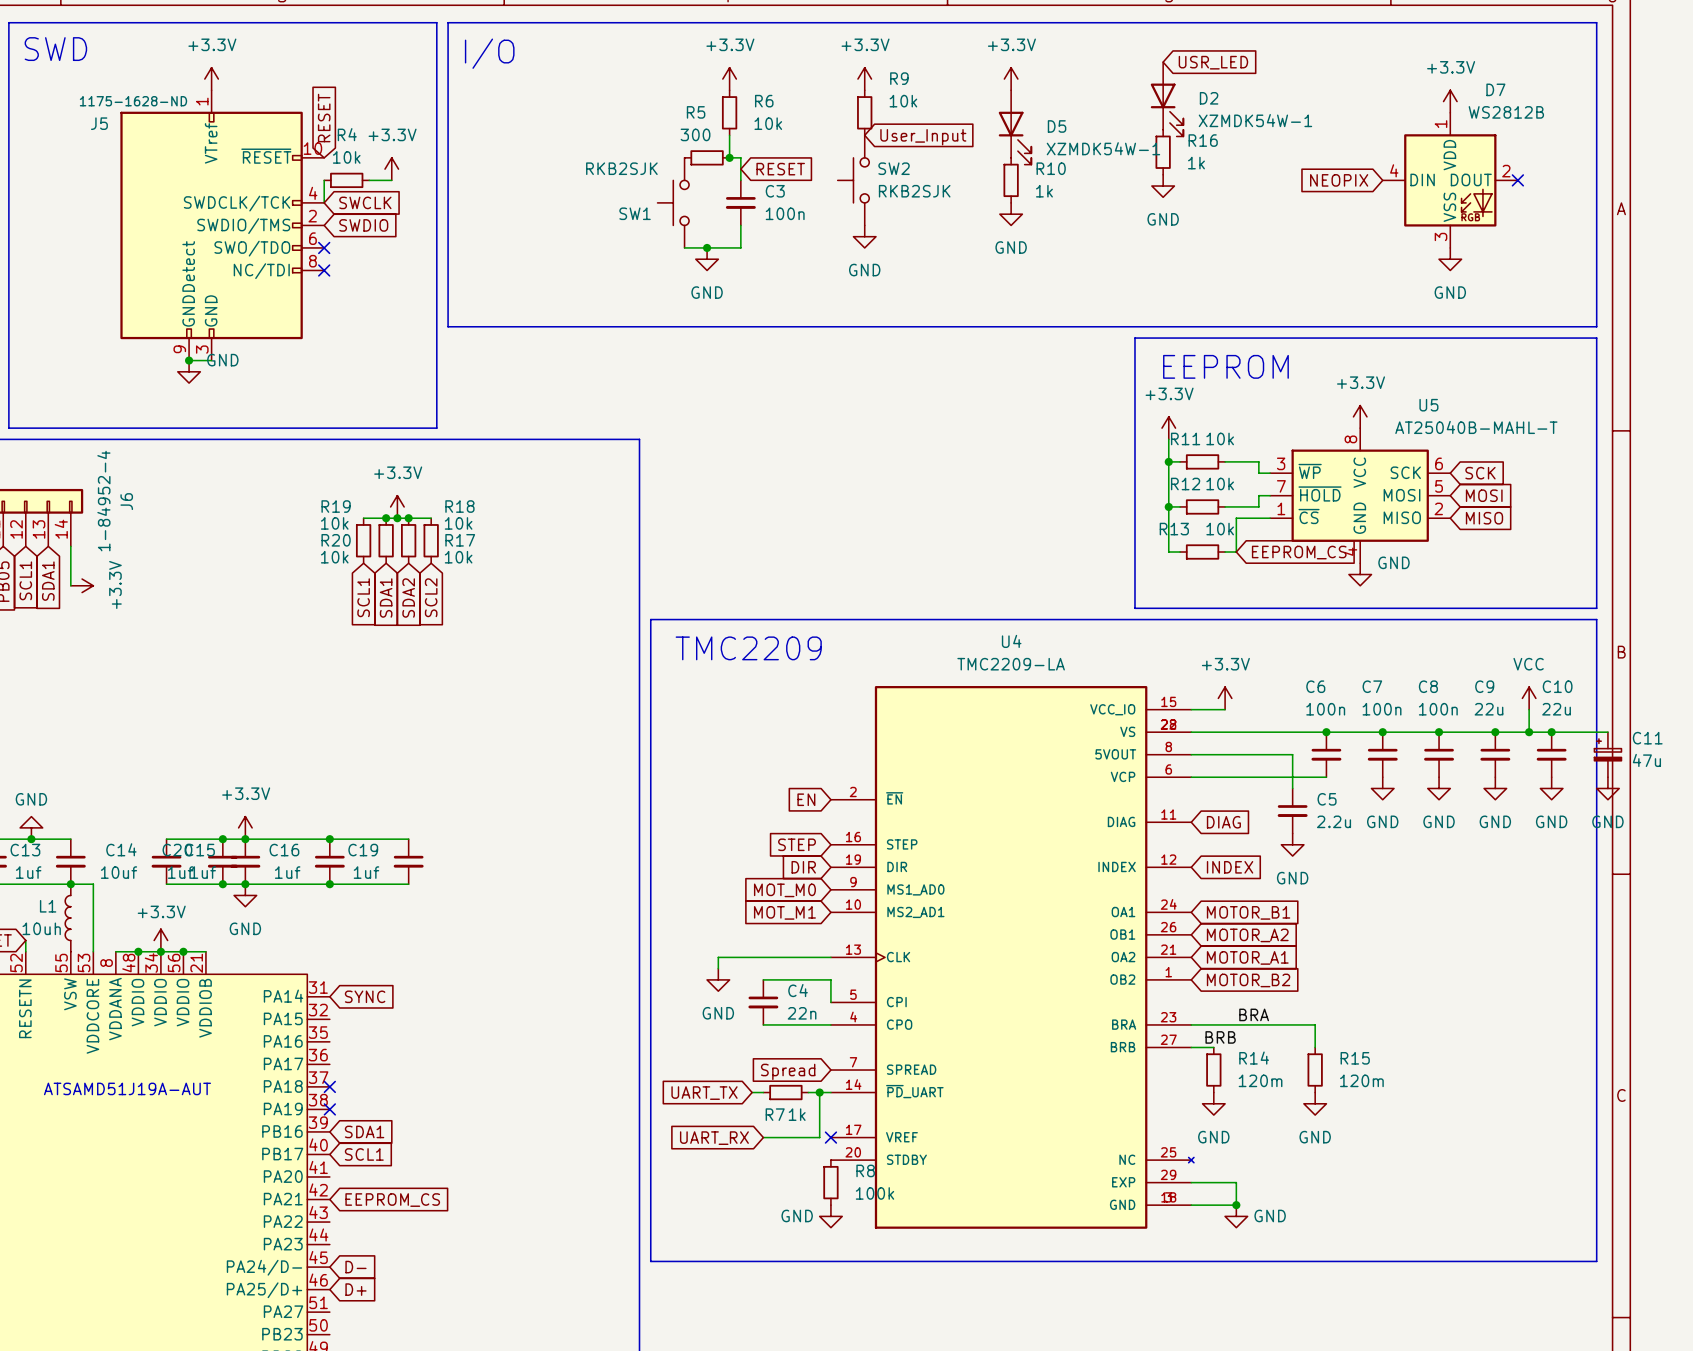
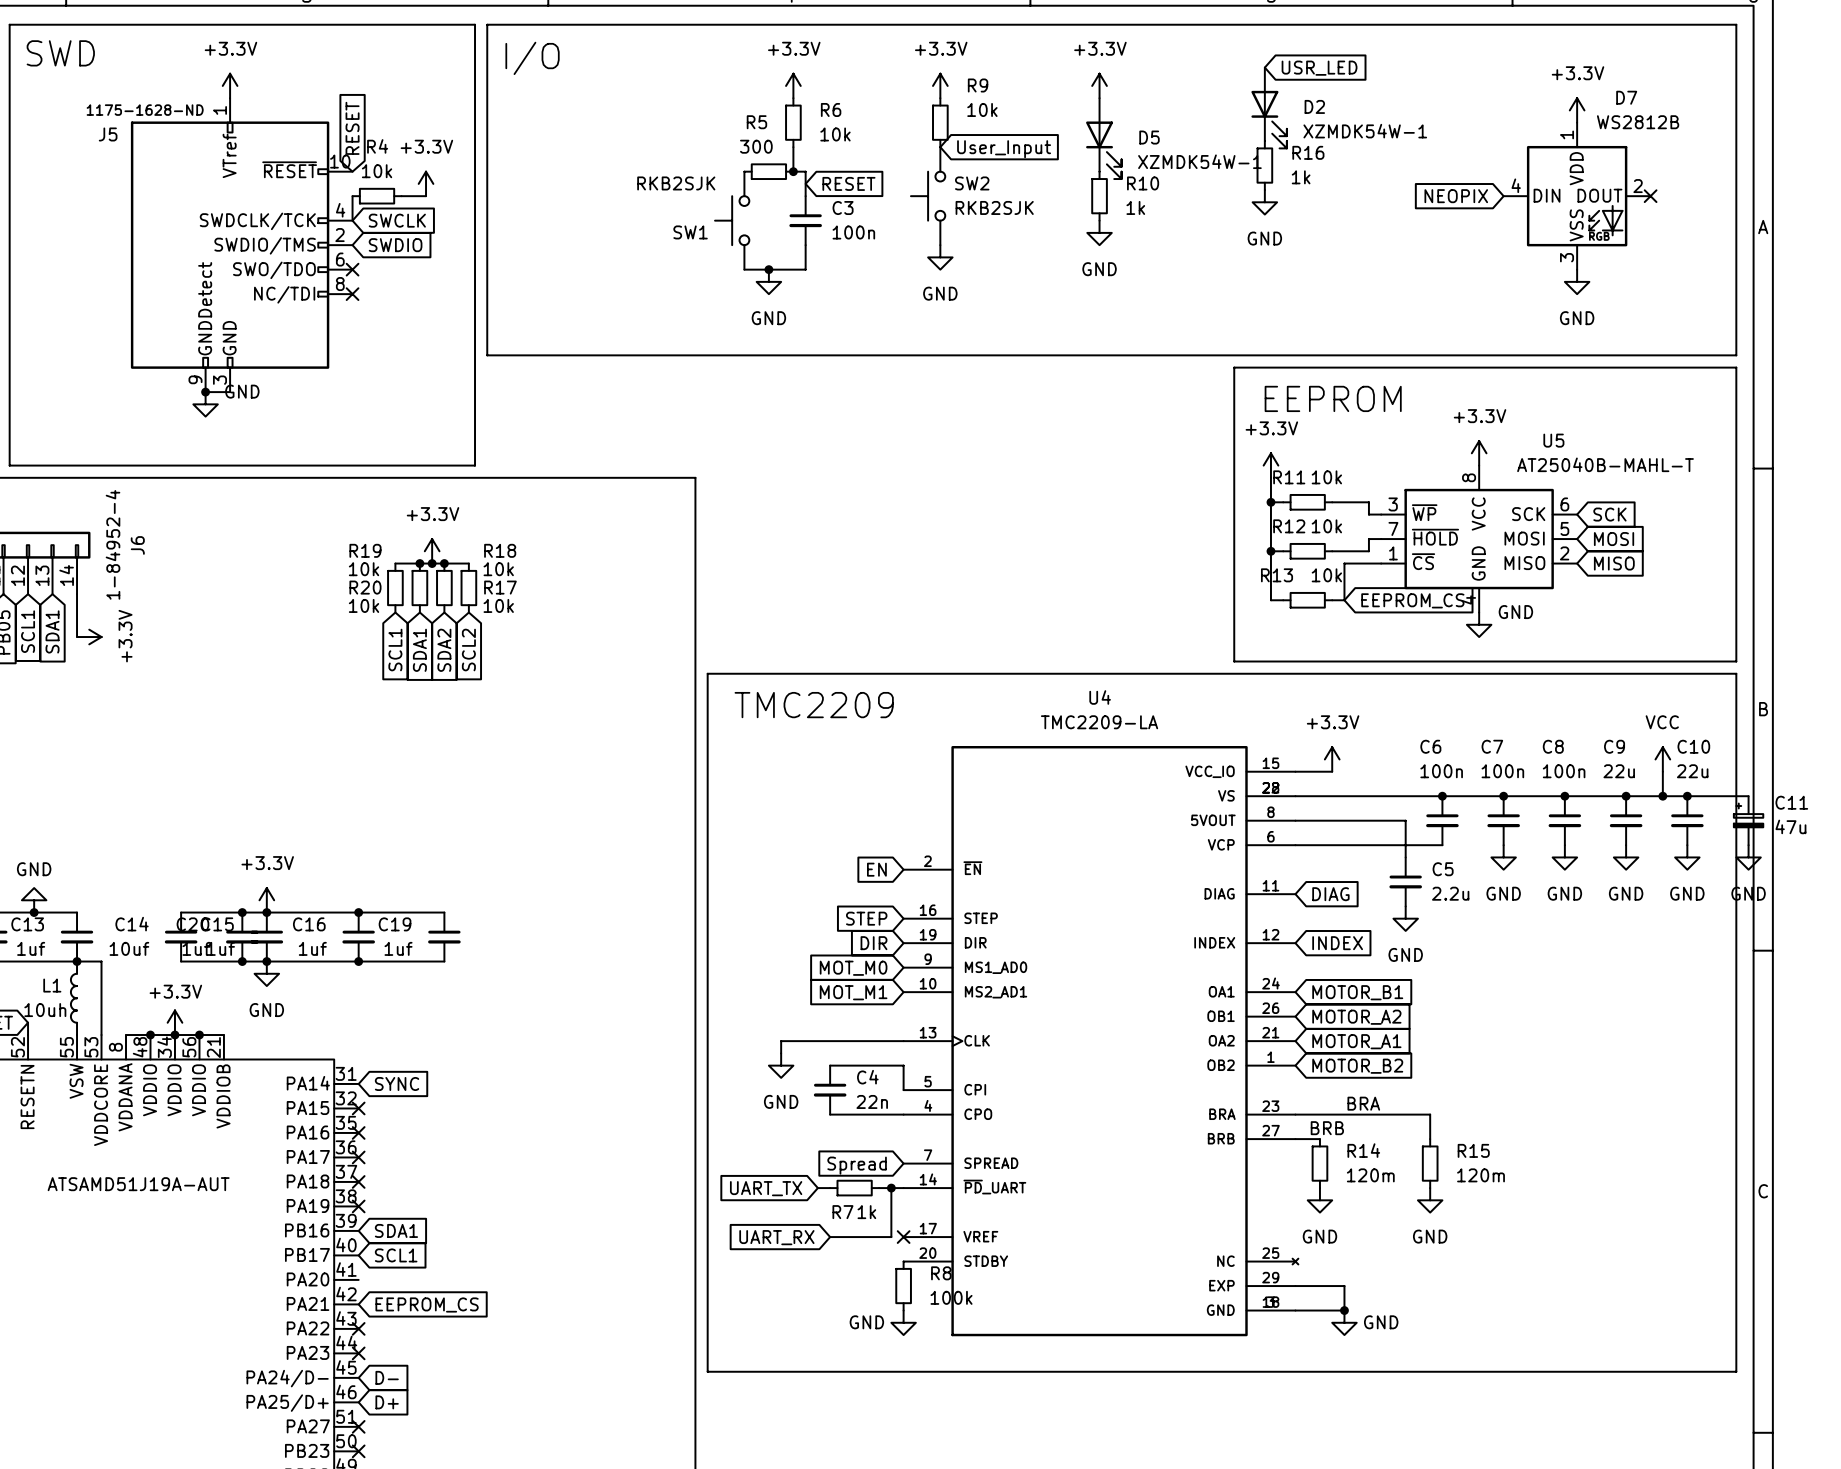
no-connect mark: none -> (358, 1108)
no-connect mark: none -> (358, 1132)
no-connect mark: none -> (358, 1157)
no-connect mark: none -> (358, 1328)
no-connect mark: none -> (358, 1353)
no-connect mark: none -> (358, 1426)
no-connect mark: none -> (358, 1451)

